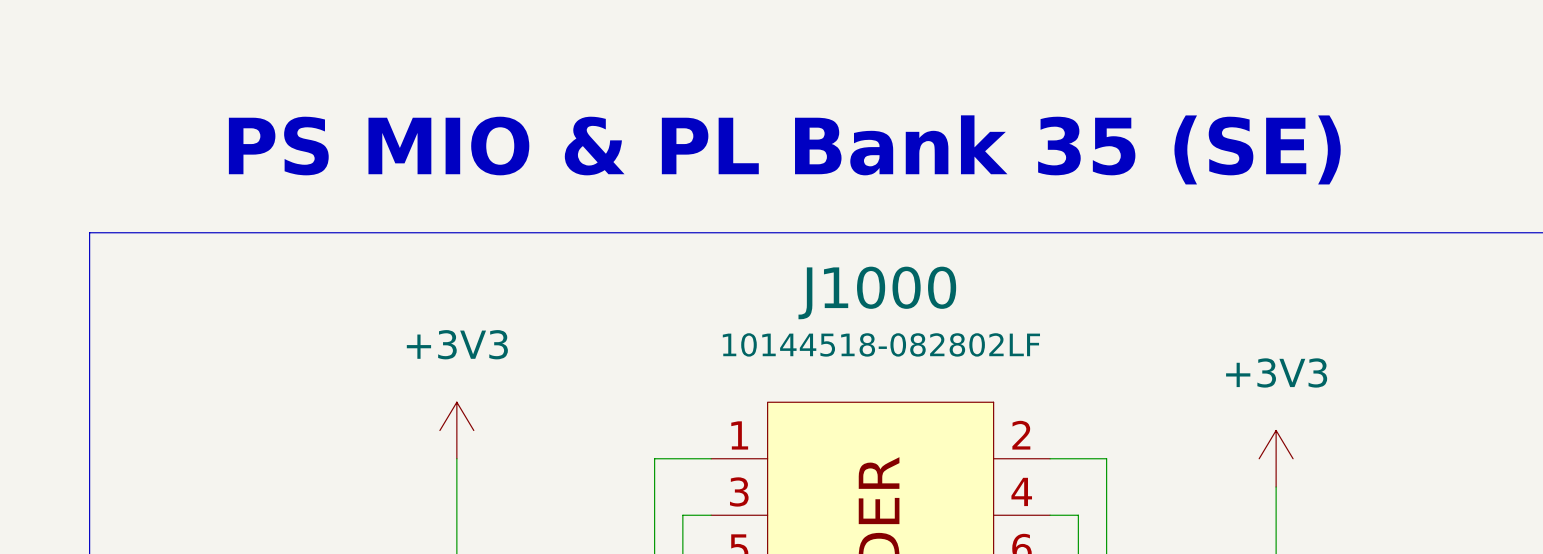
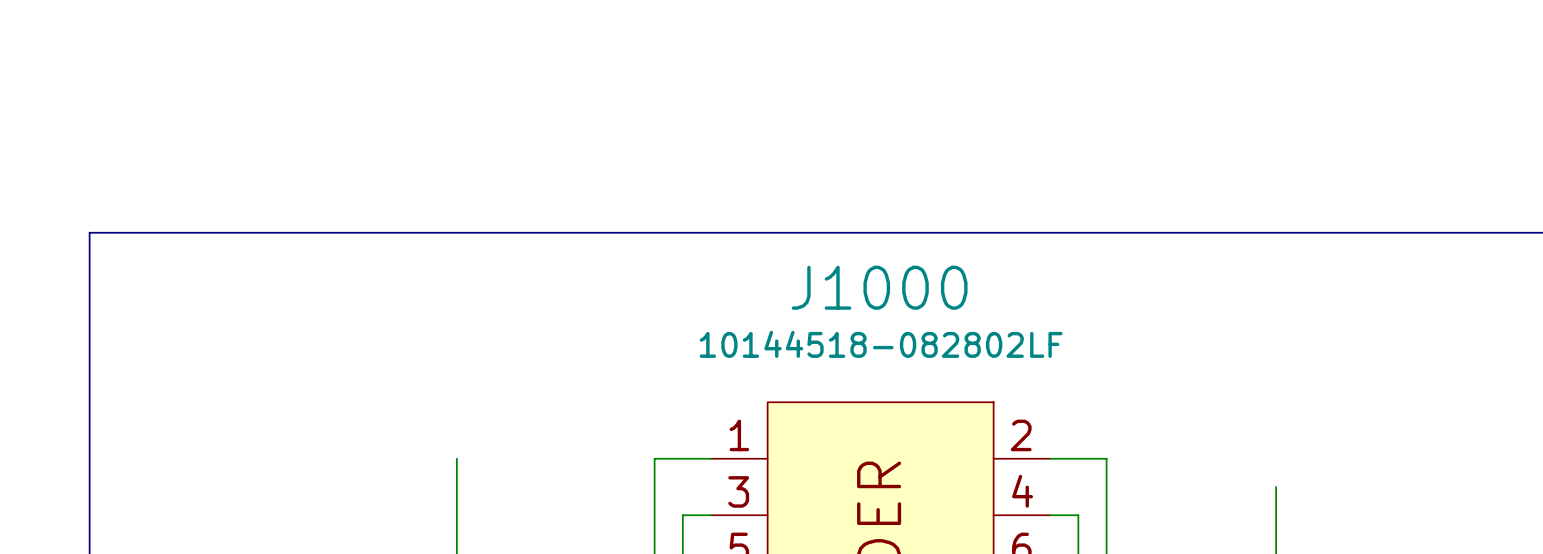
text: PS MIO & PL Bank 35 (SE) (784, 149) -> none
power symbol: +3V3 (456, 430) -> none
power symbol: +3V3 (1276, 458) -> none

